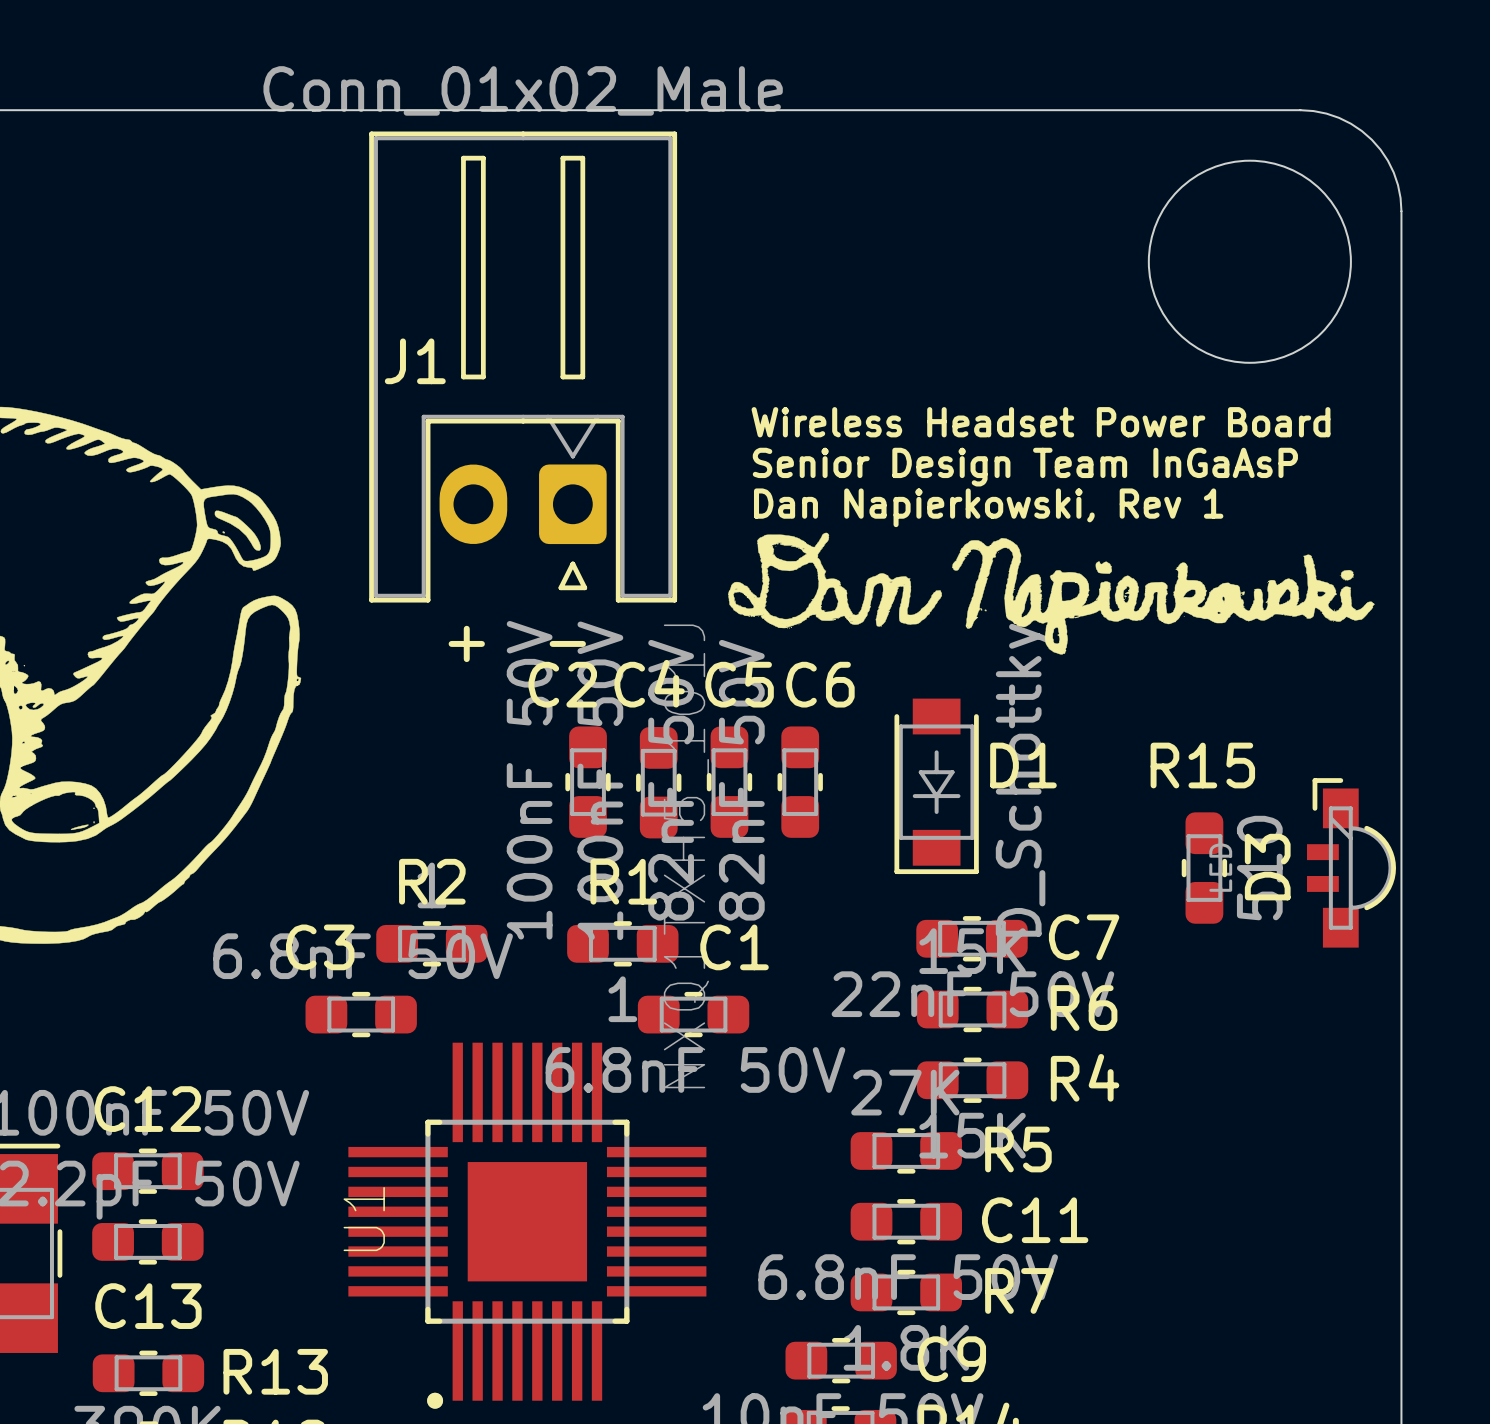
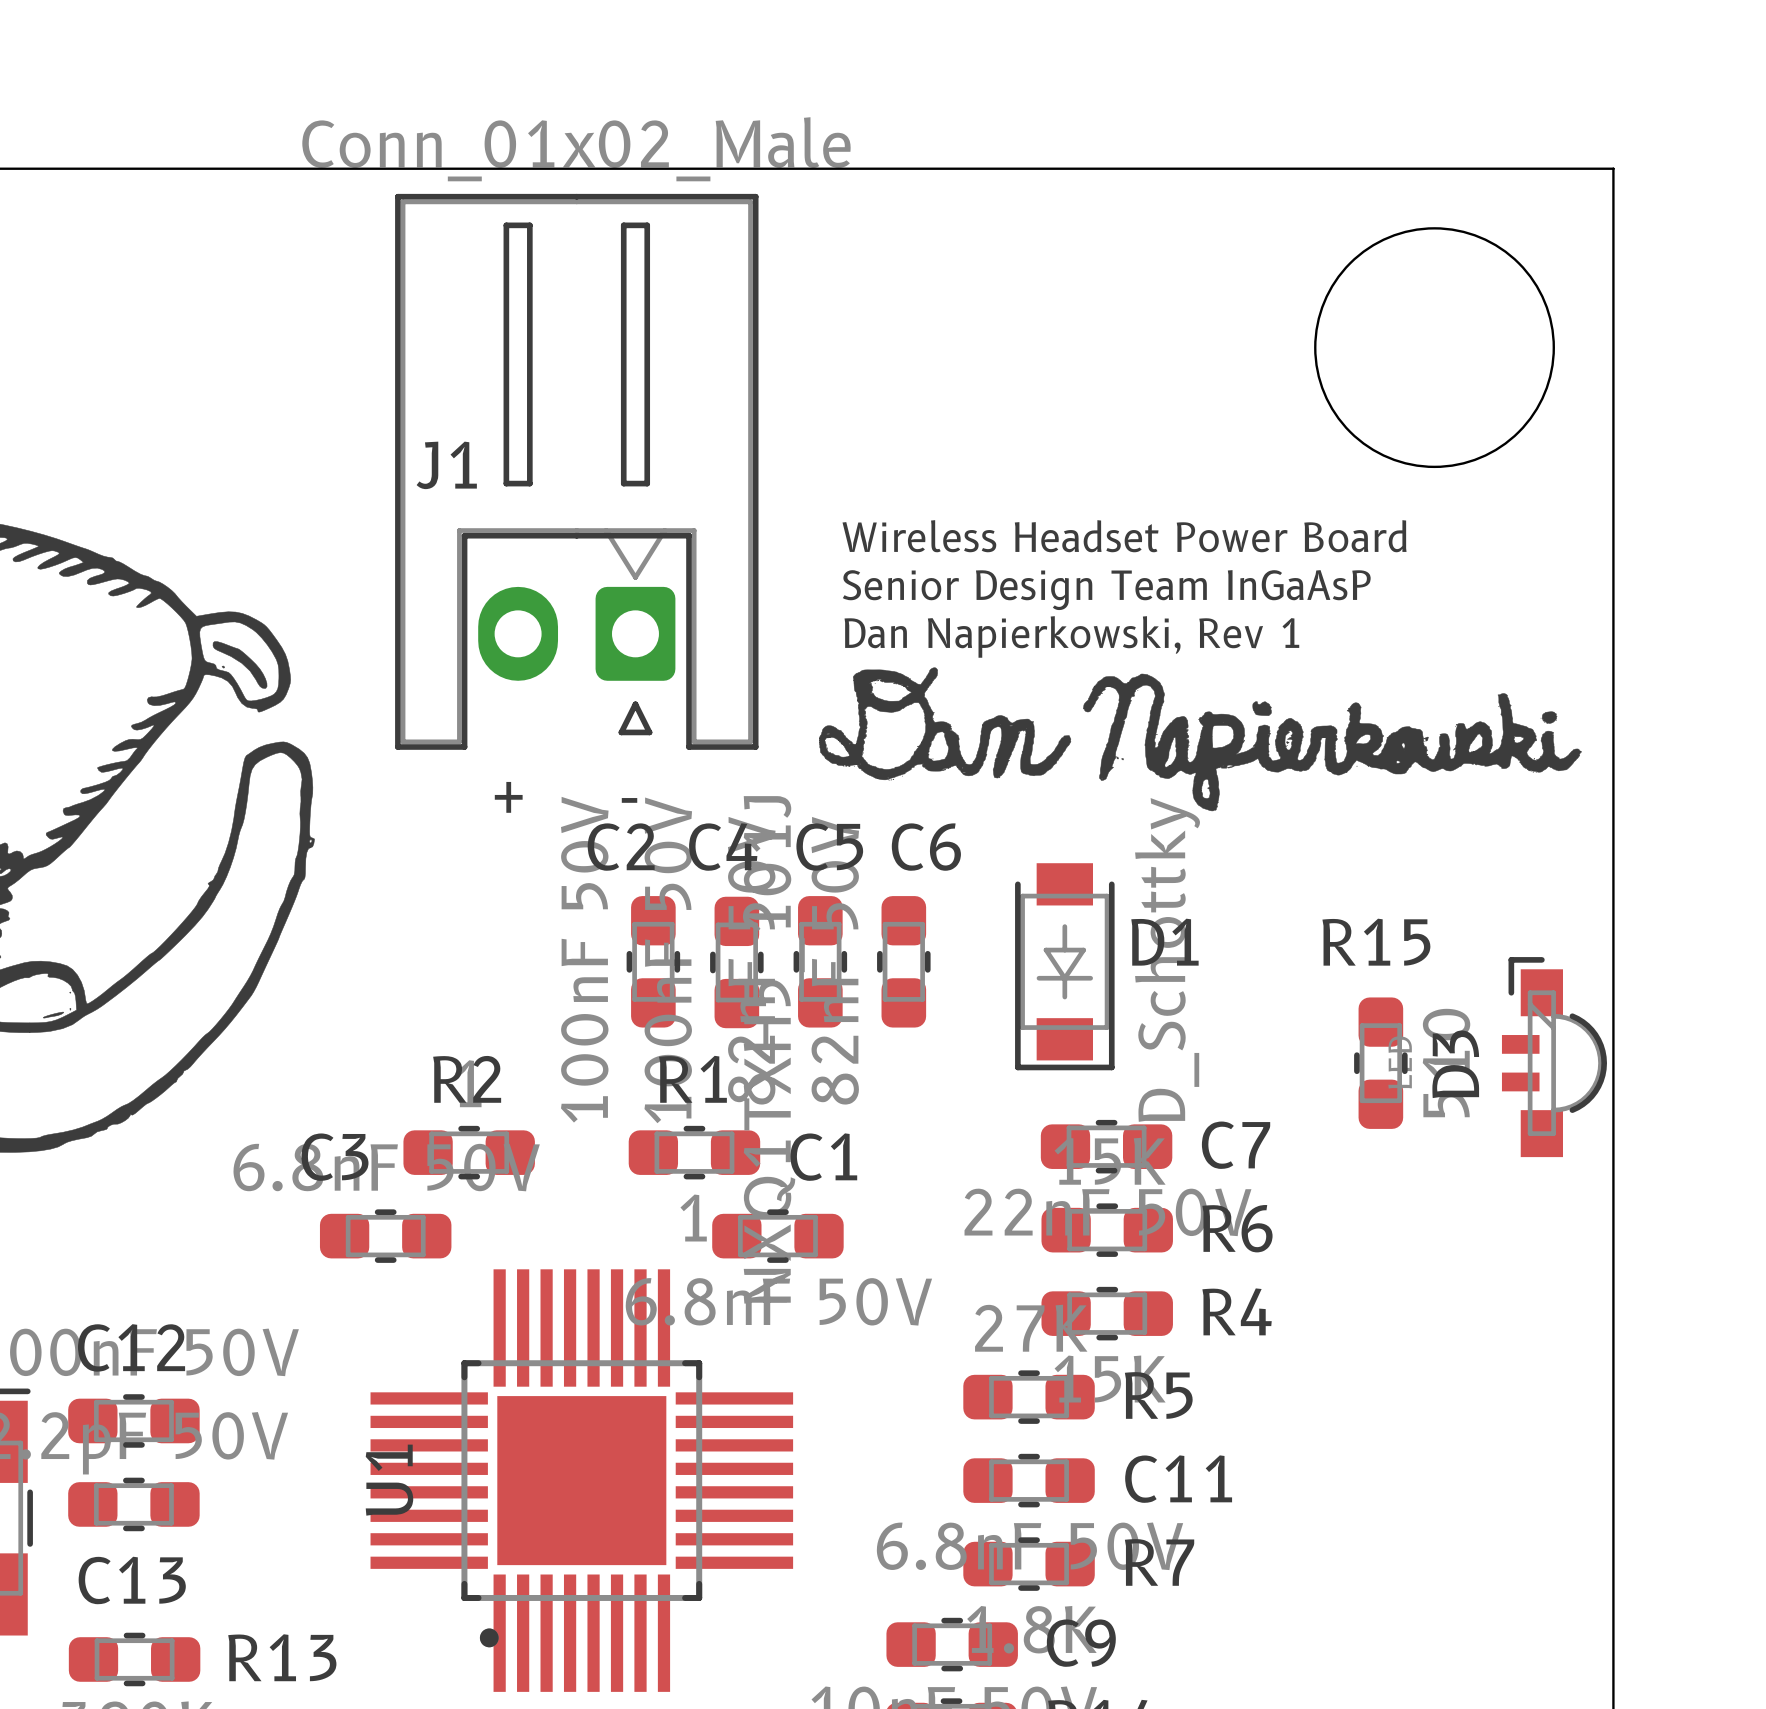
board edge: (1300, 110) (1326, 113) (1339, 117) (1350, 123) (1371, 139) (1387, 160) (1393, 172) (1400, 198) (1401, 211) -> (1494, 168) (1613, 168) (1613, 287)
U1 footprint: [348, 1042, 707, 1409] -> [370, 1269, 794, 1692]

